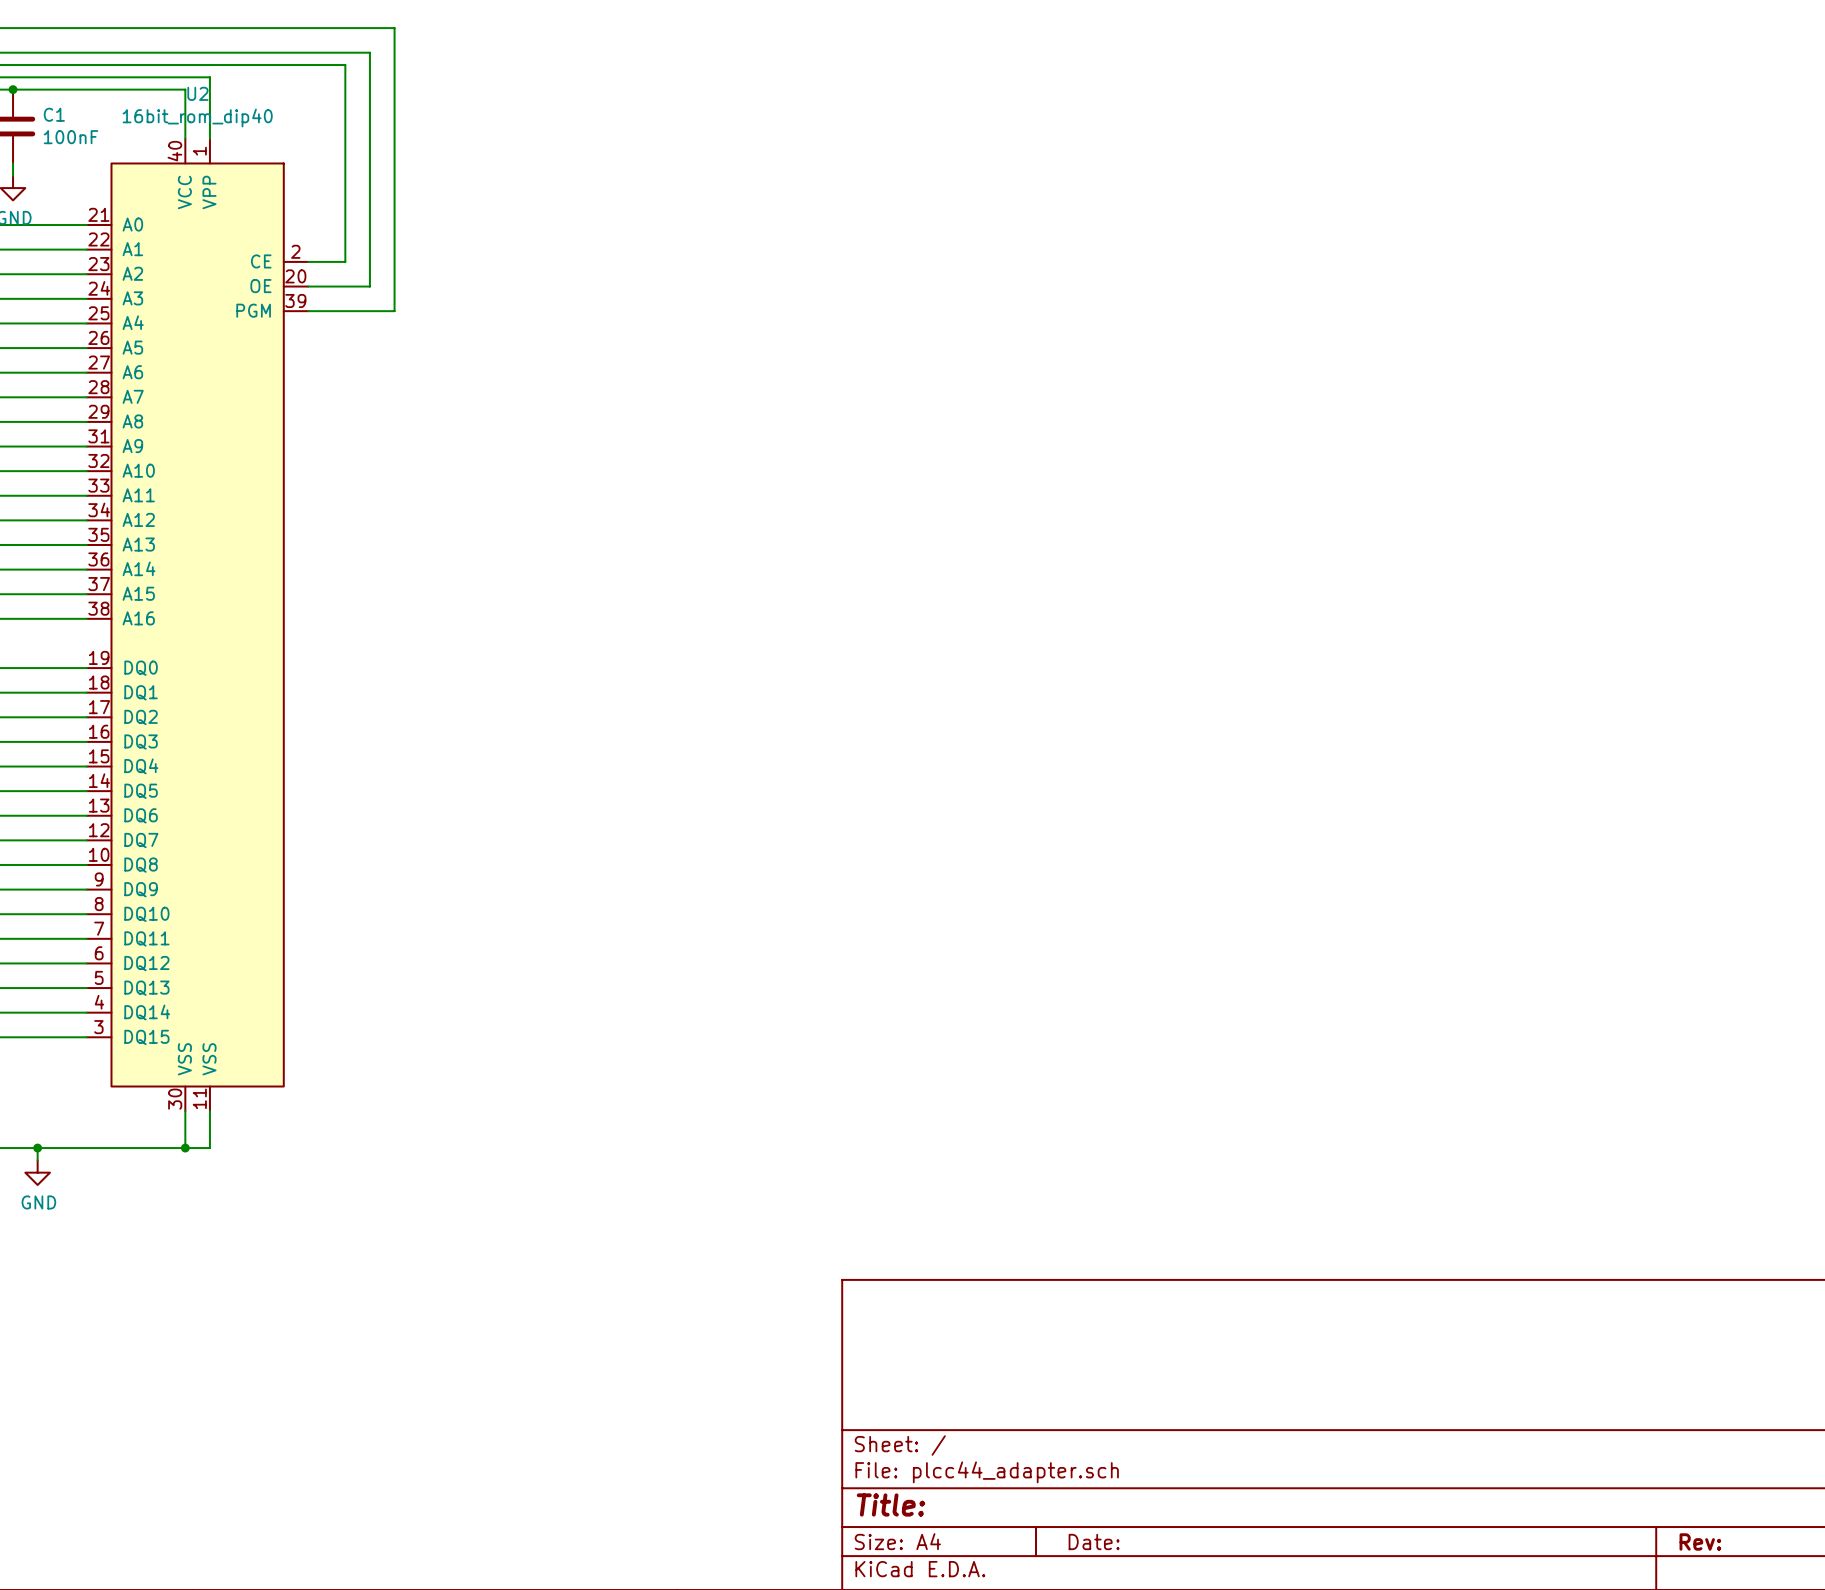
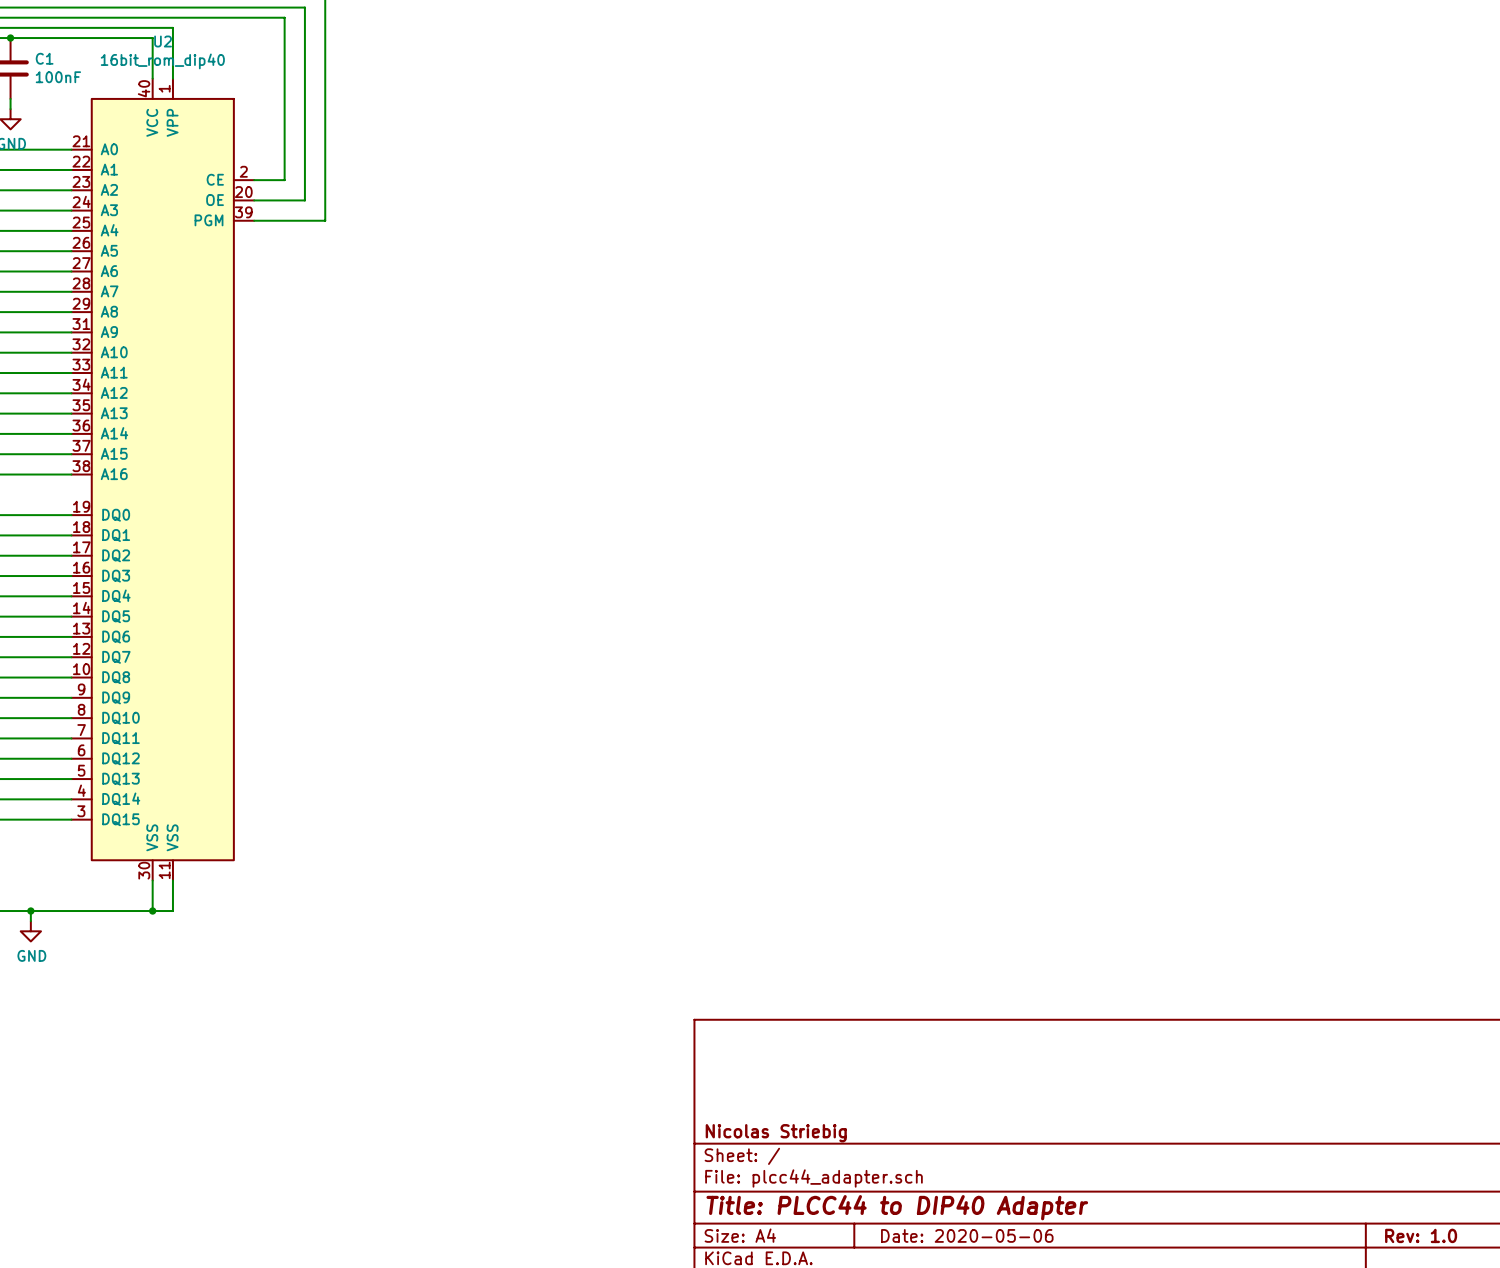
title block: none -> Nicolas Striebig (776, 1133)
title block: Title: (890, 1504) -> Title: PLCC44 to DIP40 Adapter (897, 1207)
title block: Date: (1094, 1541) -> Date: 2020-05-06 (967, 1235)
title block: Rev: (1700, 1541) -> Rev: 1.0 (1421, 1235)

